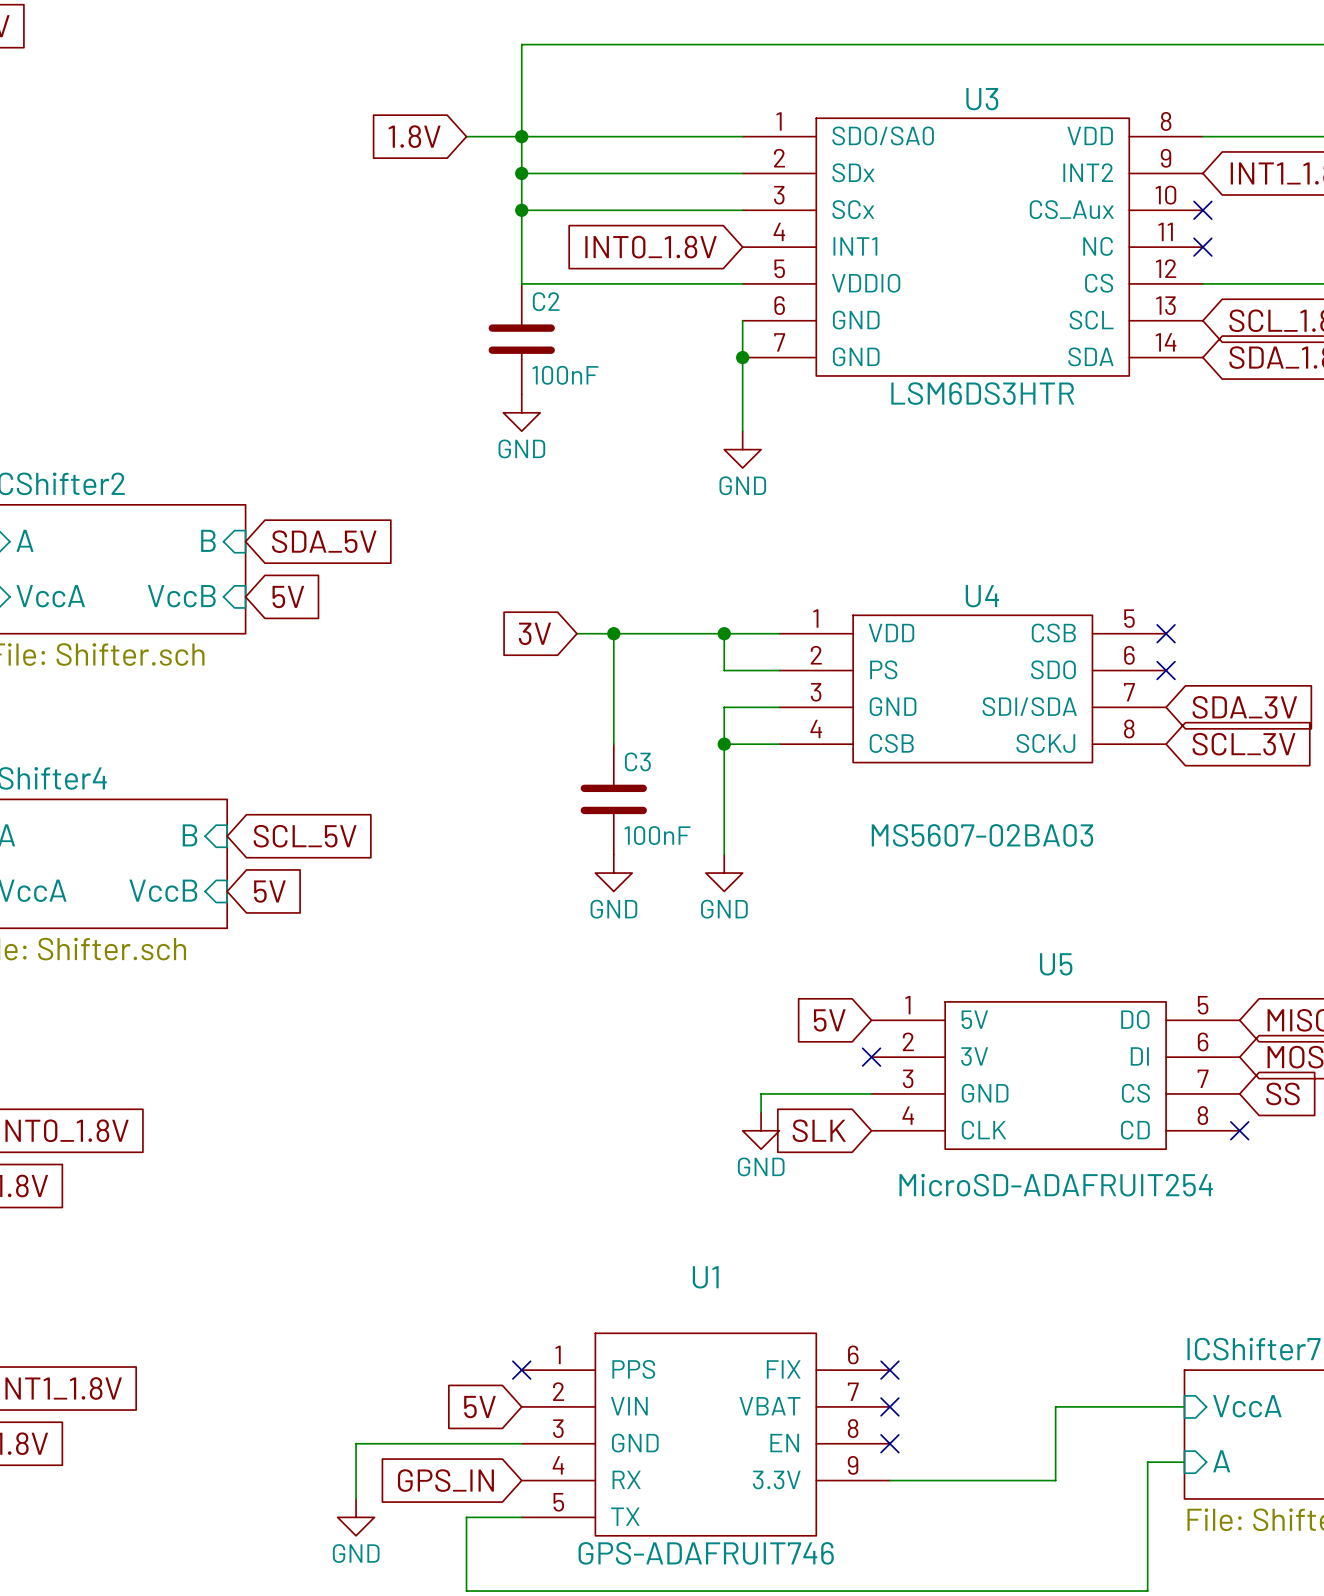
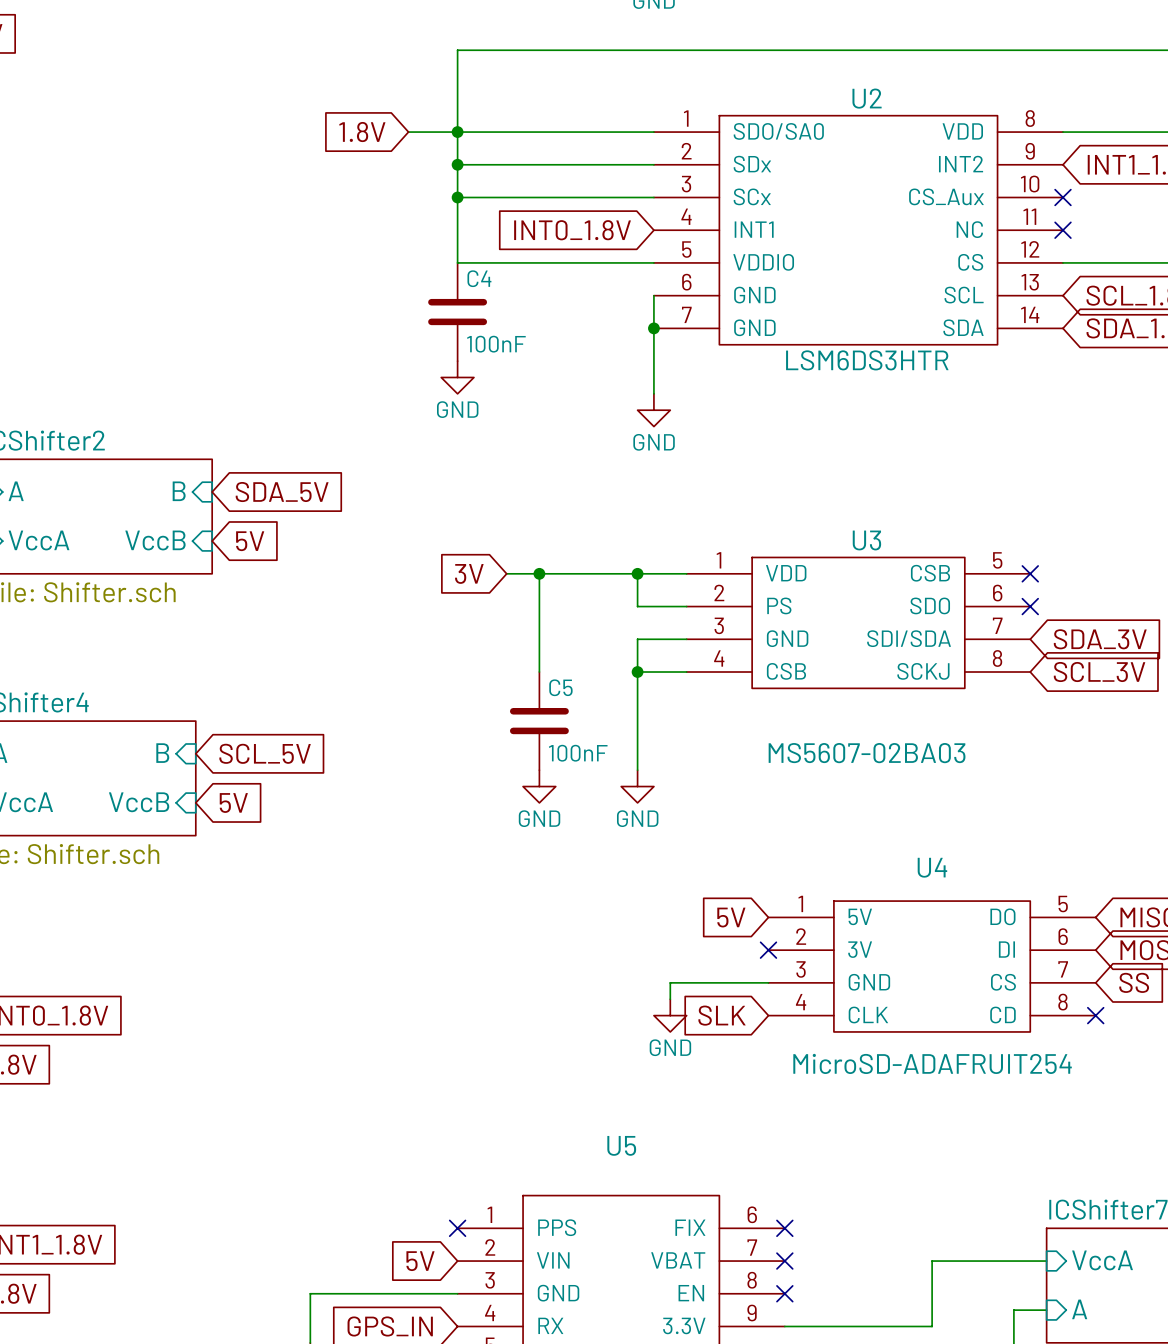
U3 name: U3 (982, 99) -> U2 (867, 98)
C2 name: C2 (546, 301) -> C4 (479, 278)
U4 name: U4 (982, 596) -> U3 (866, 540)
C3 name: C3 (637, 761) -> C5 (560, 687)
U5 name: U5 (1056, 964) -> U4 (932, 867)
U1 name: U1 (705, 1277) -> U5 (621, 1145)

